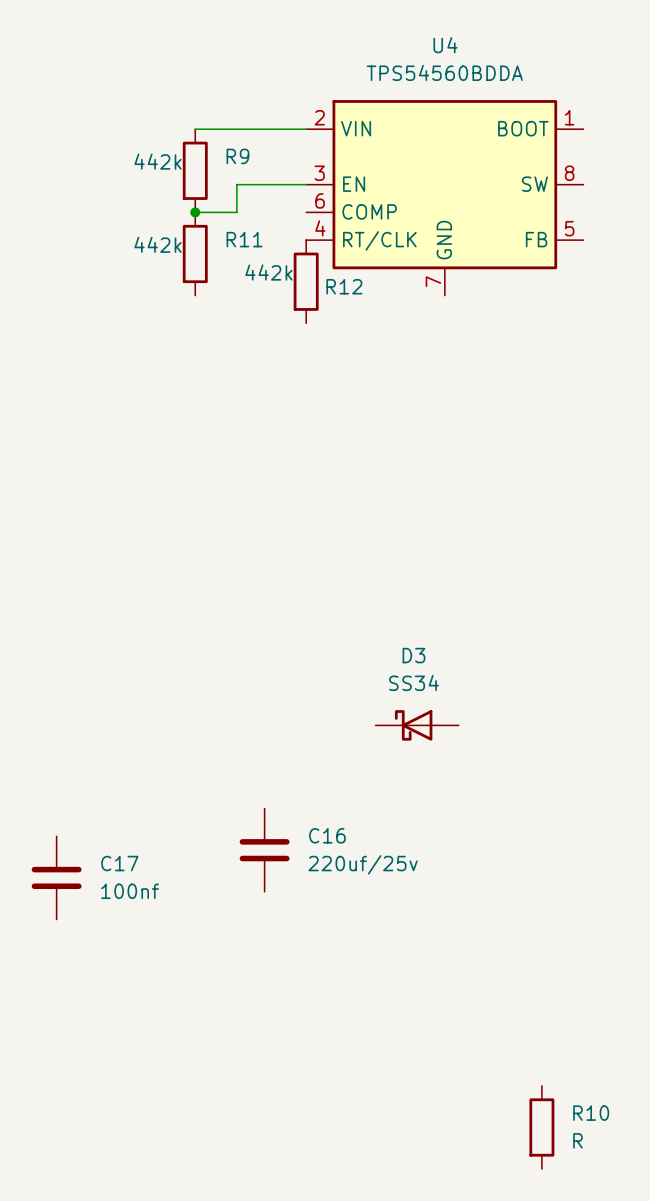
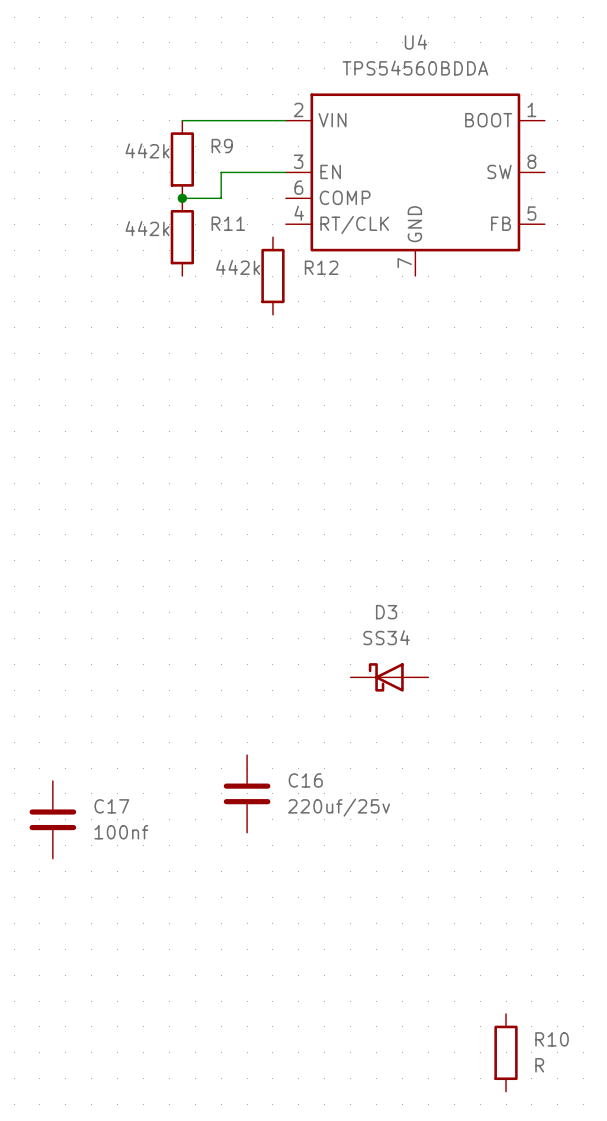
R12 position: (306, 281) -> (272, 276)

